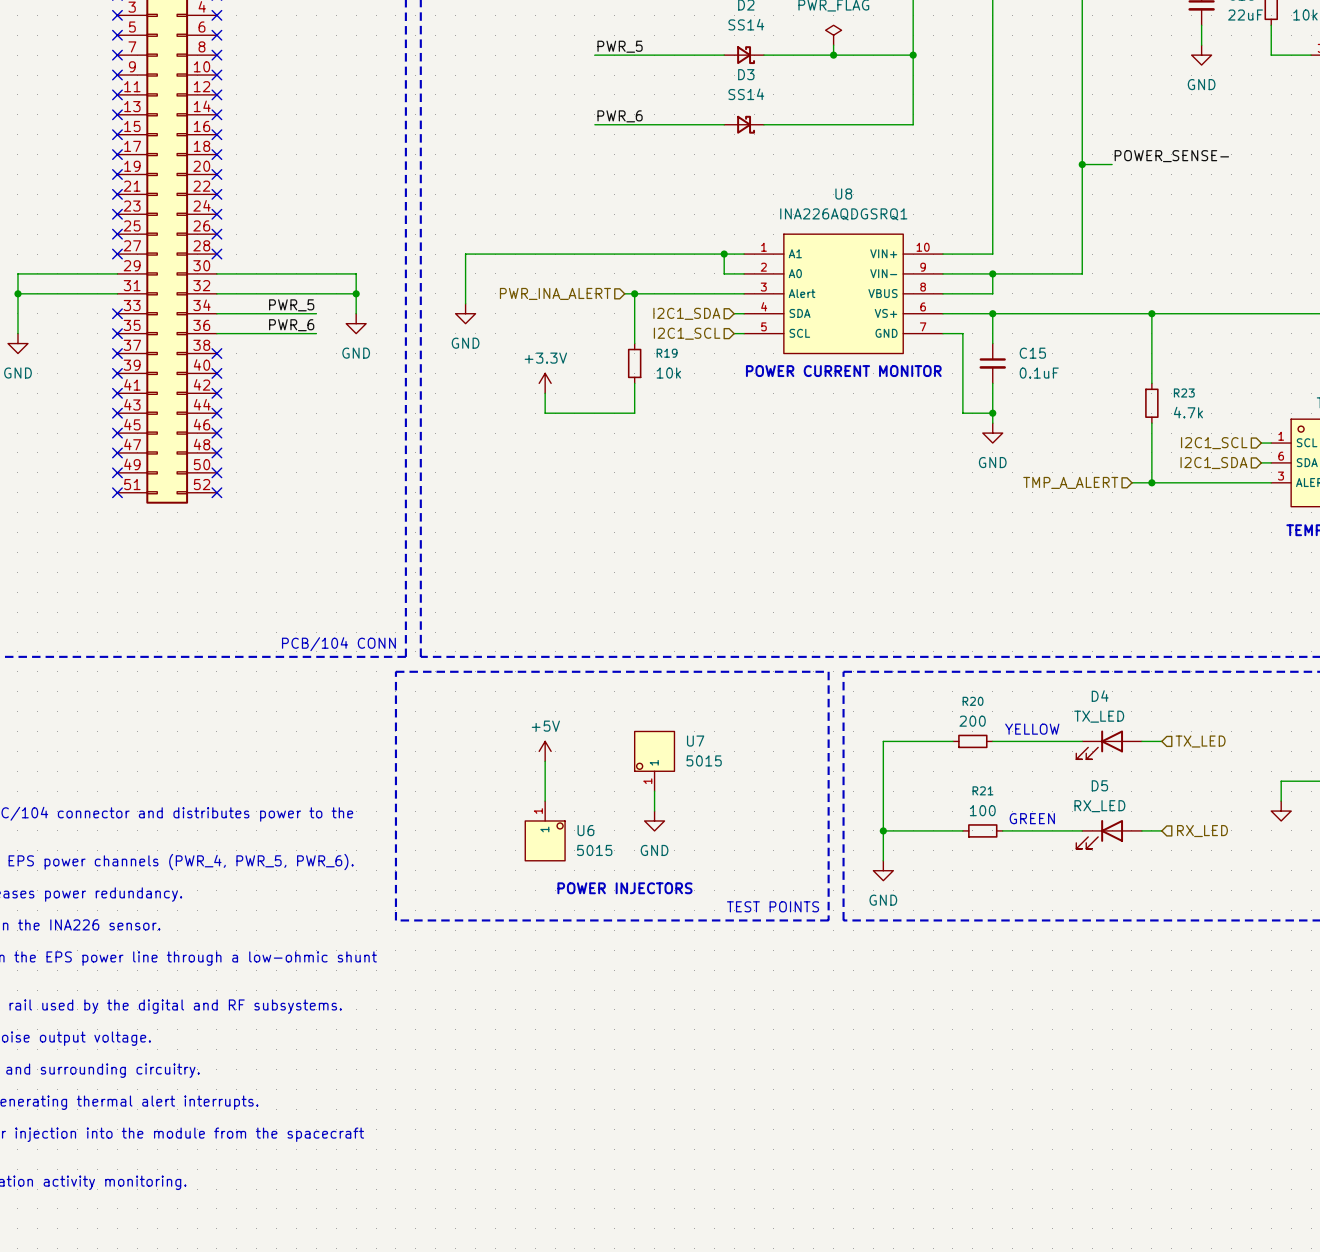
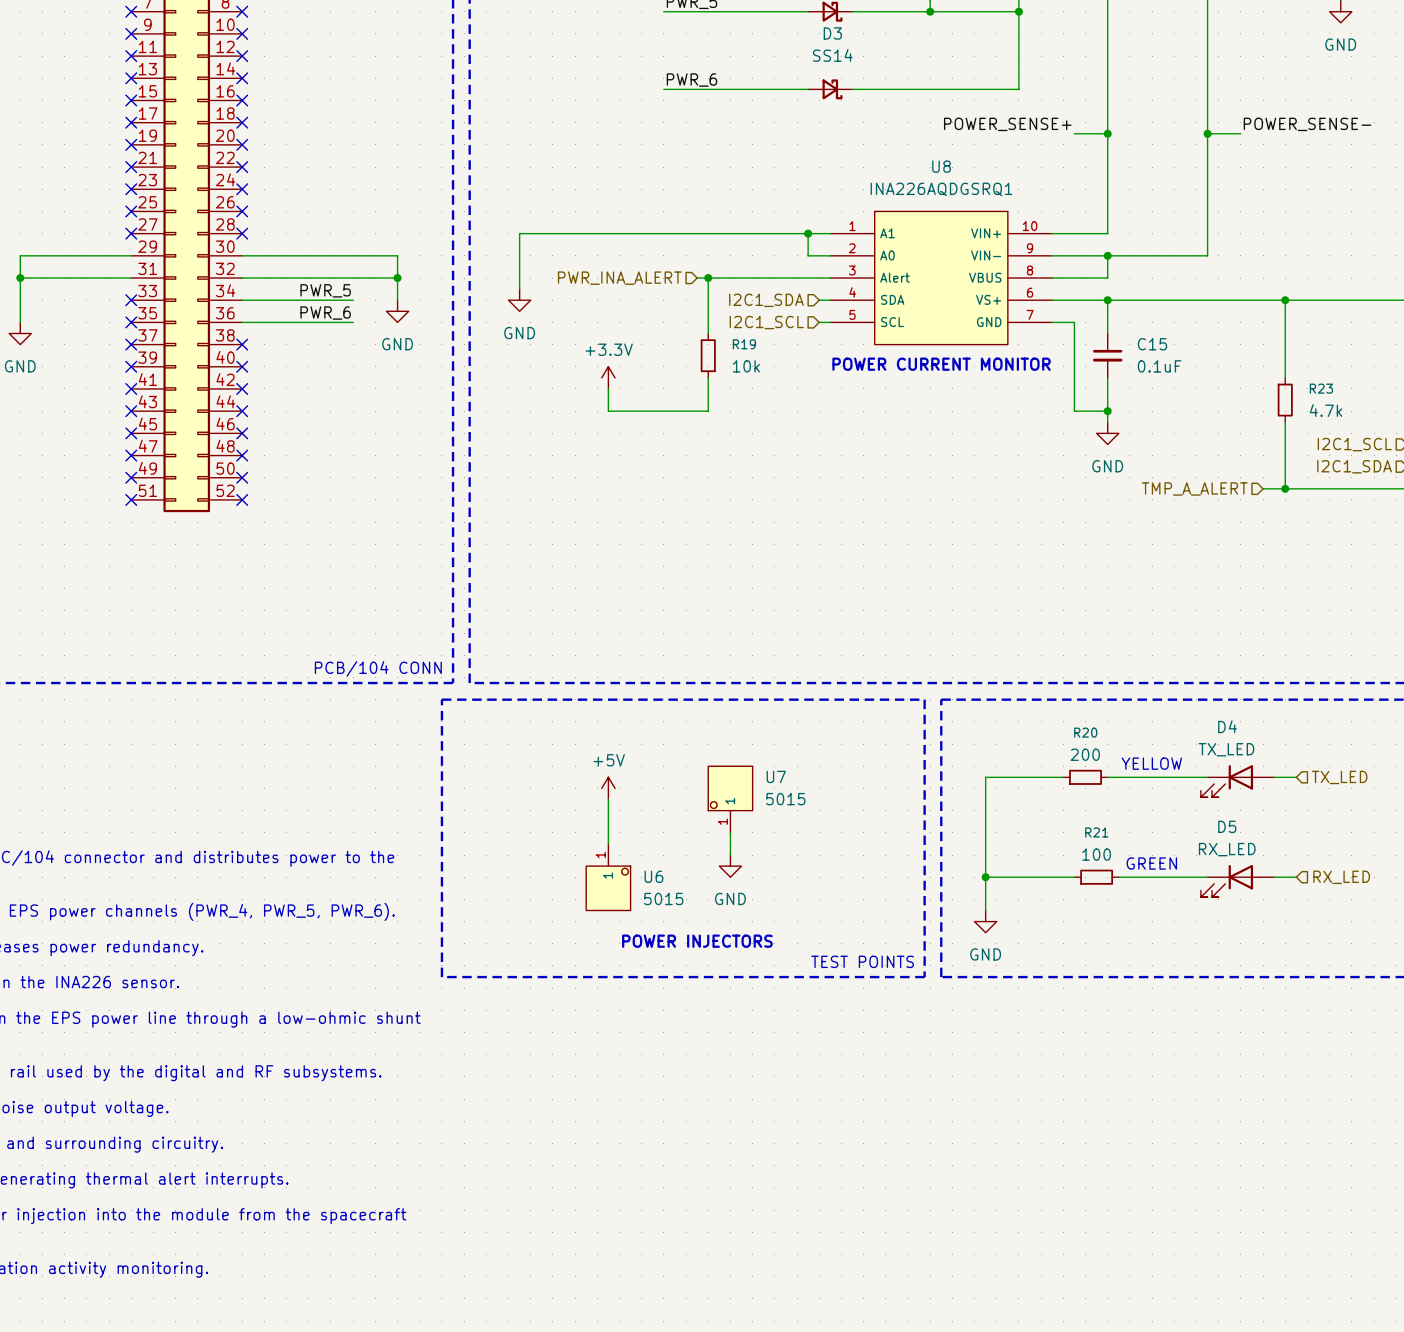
label: none -> POWER_SENSE+ (1007, 124)
wire: none -> (1074, 133) (1107, 133)
junction: none -> (1107, 133)

